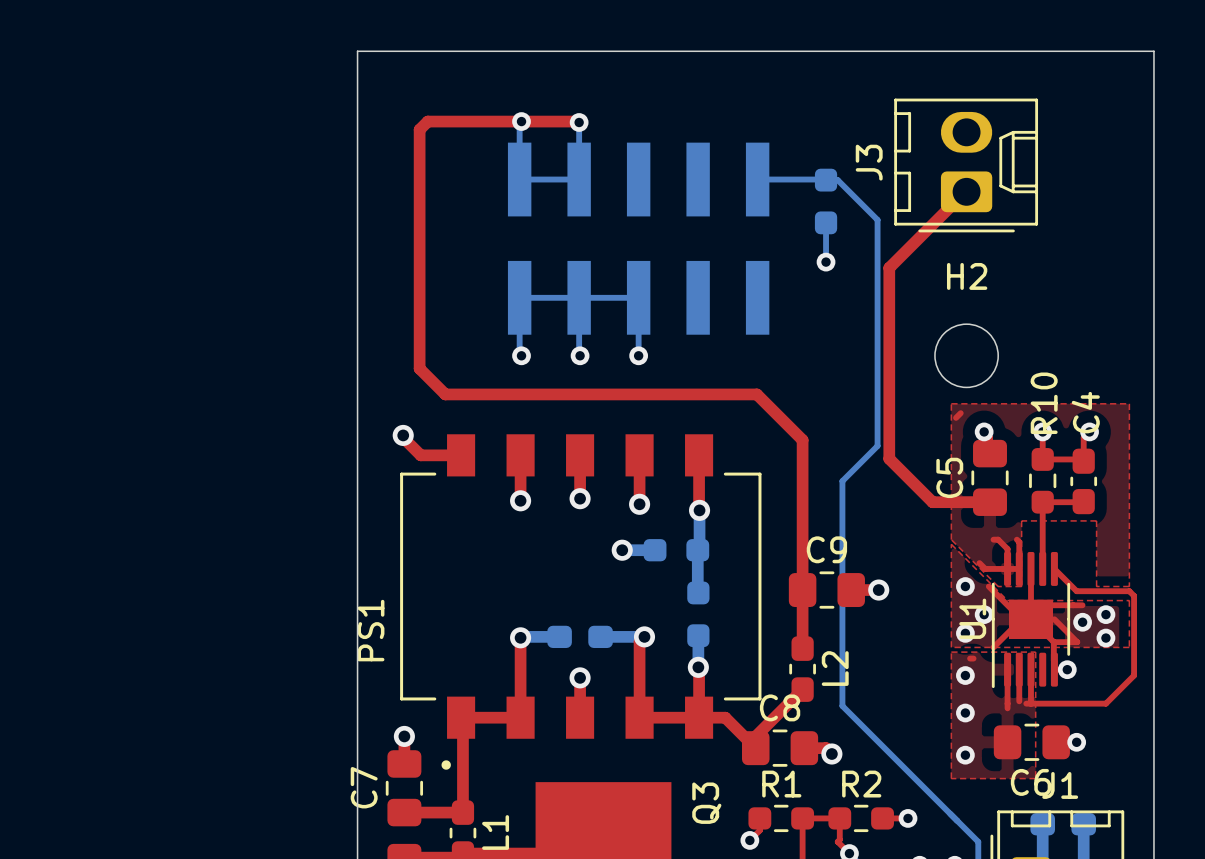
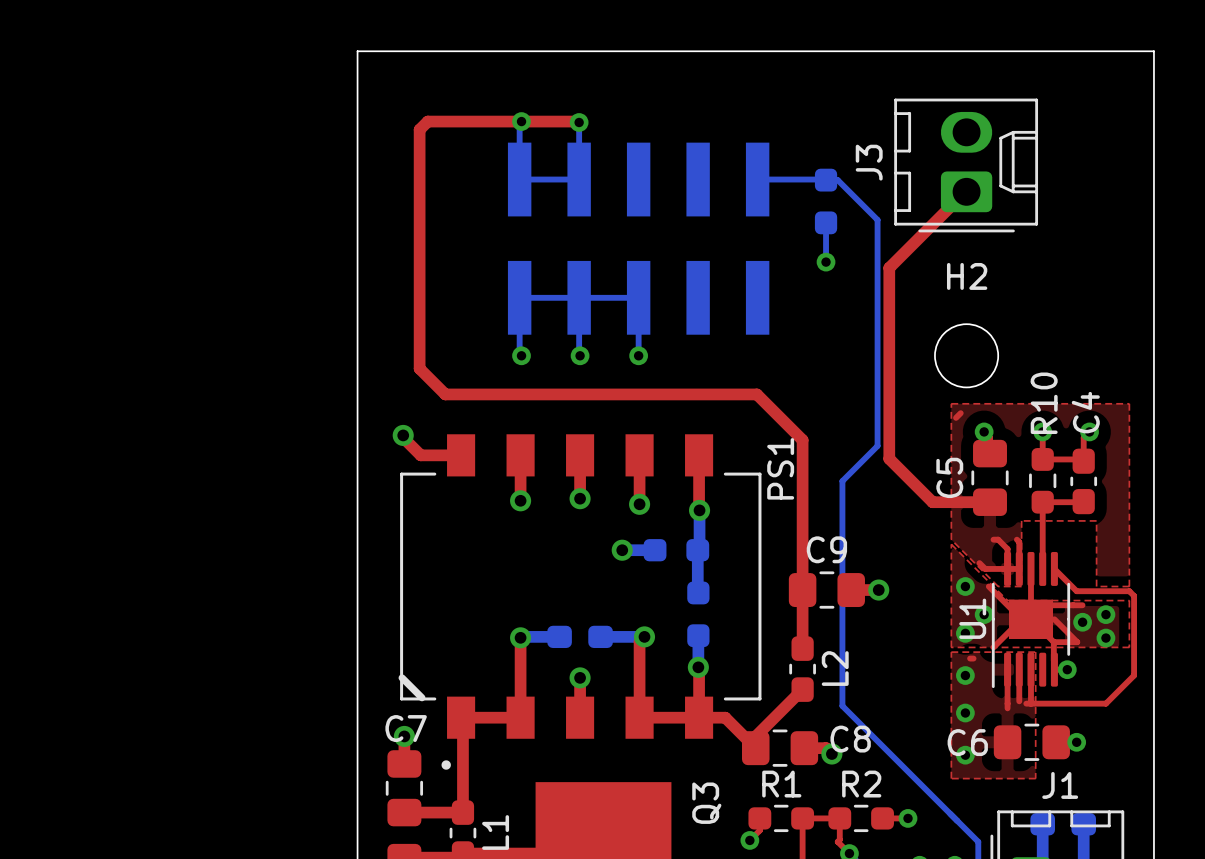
PS1 name position: PS1 (370, 630) -> PS1 (780, 468)
line: none -> (402, 677) (421, 697)
C8 name position: C8 (780, 707) -> C8 (850, 739)
C6 name position: C6 (1031, 782) -> C6 (967, 742)
C7 name rotation: 0° (364, 787) -> 90° clockwise (406, 728)
C7 name position: C7 (364, 787) -> C7 (406, 728)

